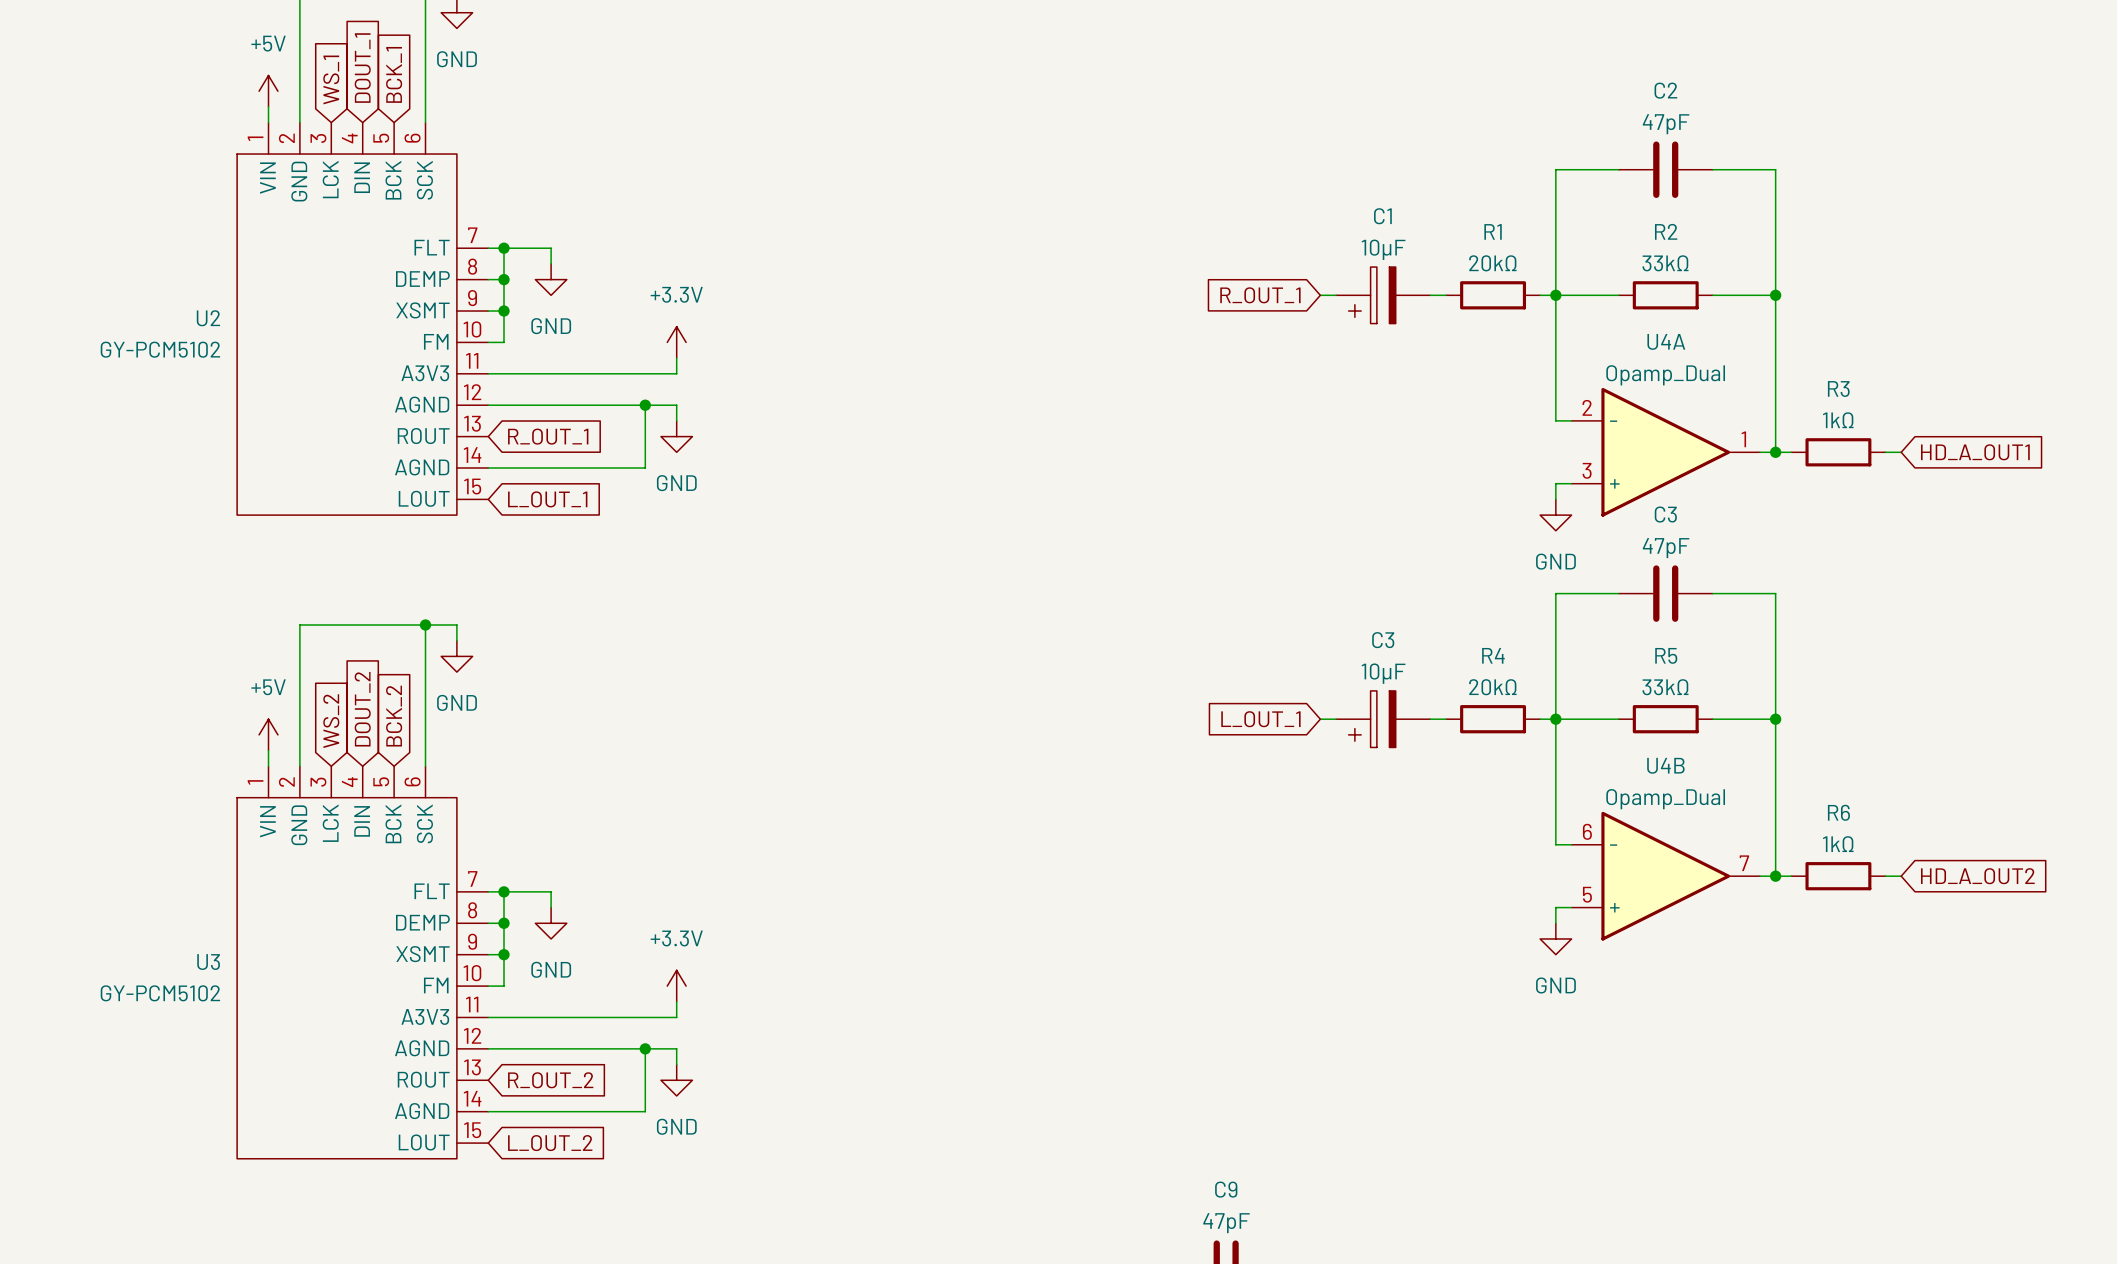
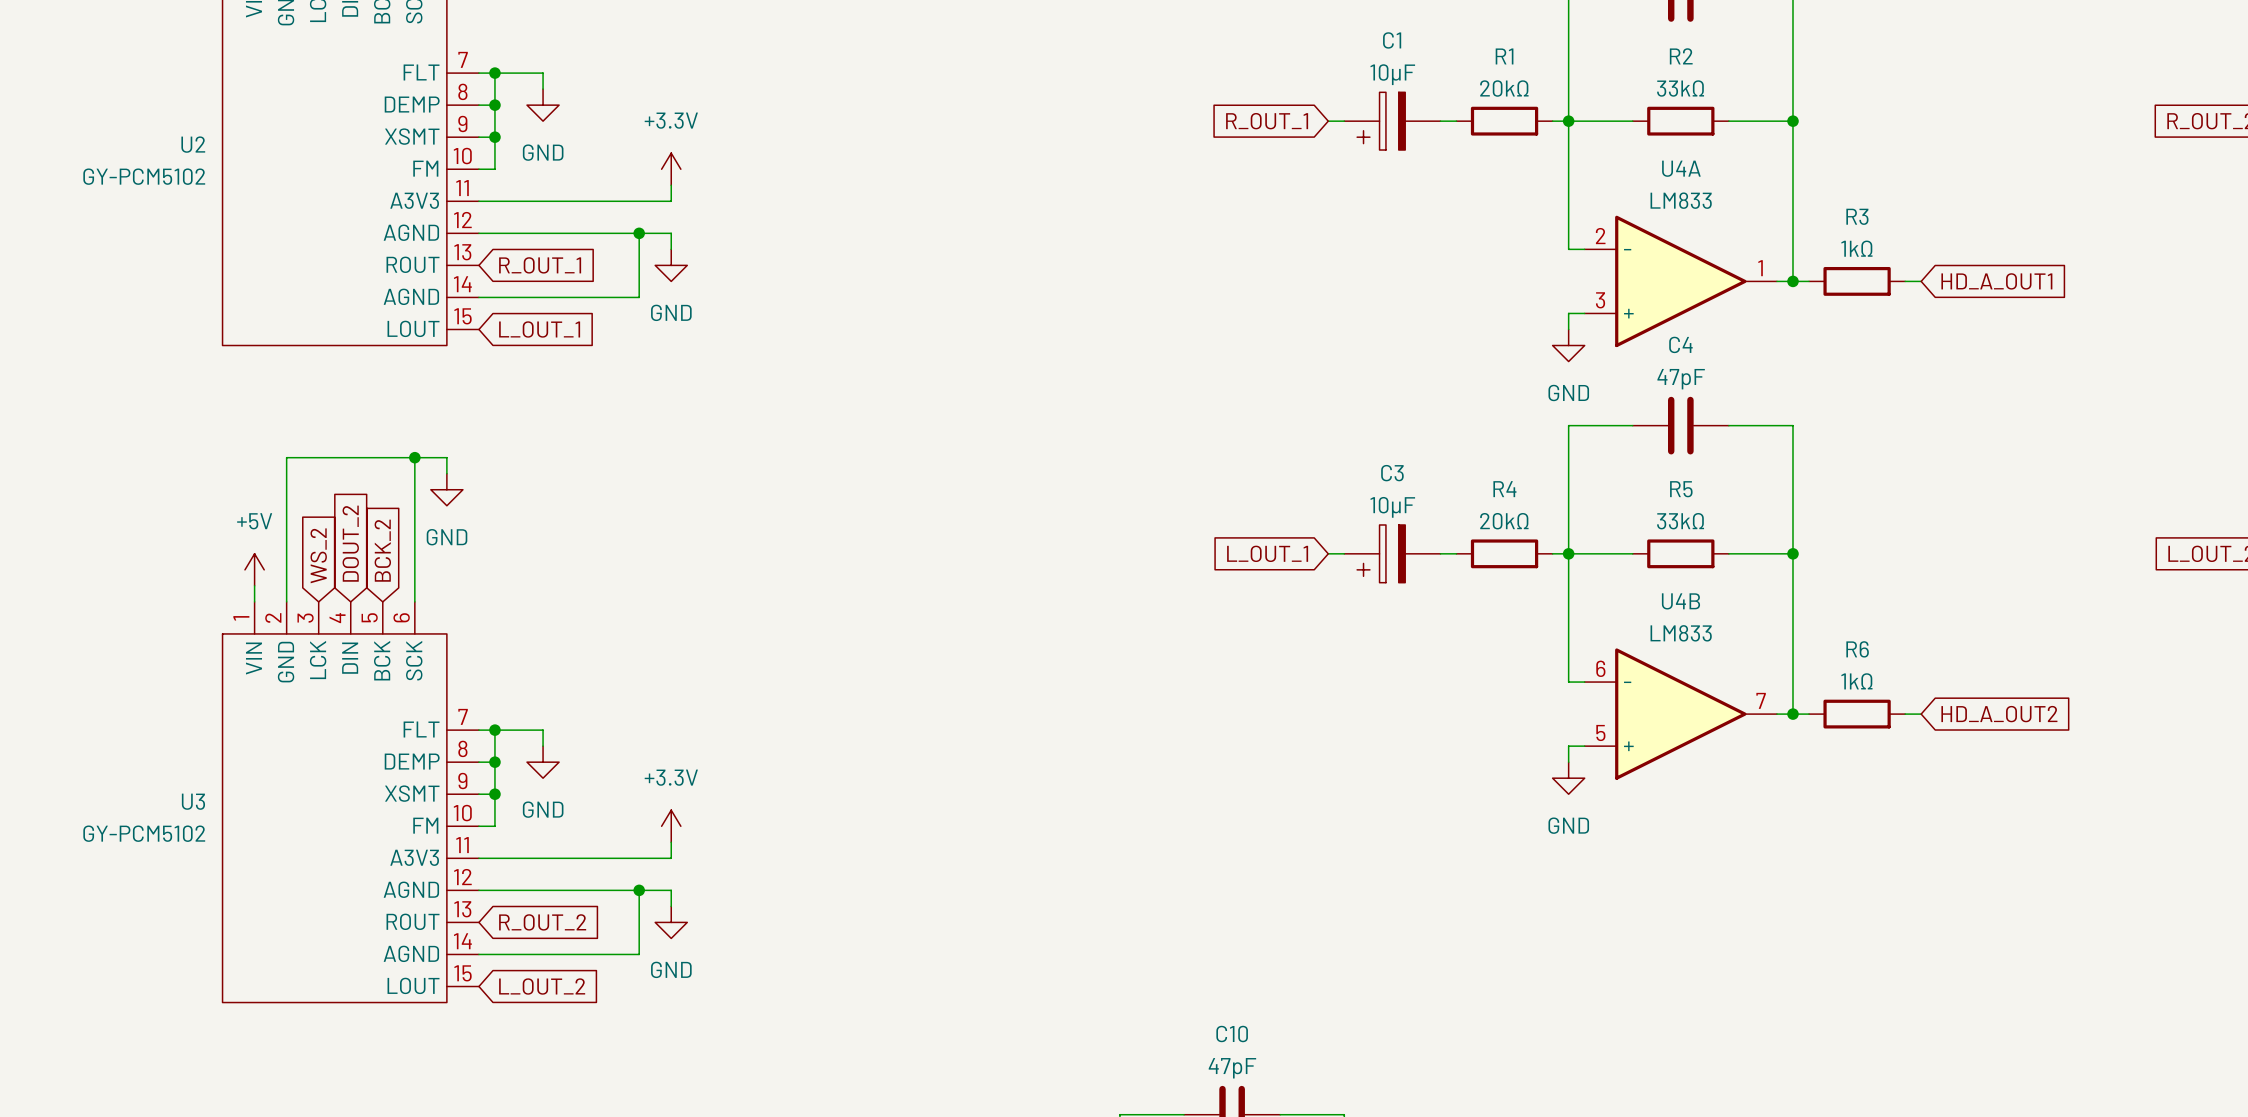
U4A value: Opamp_Dual (1665, 375) -> LM833 (1681, 200)
C3 name: C3 (1665, 514) -> C4 (1680, 344)
U4B value: Opamp_Dual (1665, 799) -> LM833 (1681, 633)
C9 name: C9 (1226, 1189) -> C10 (1232, 1034)

